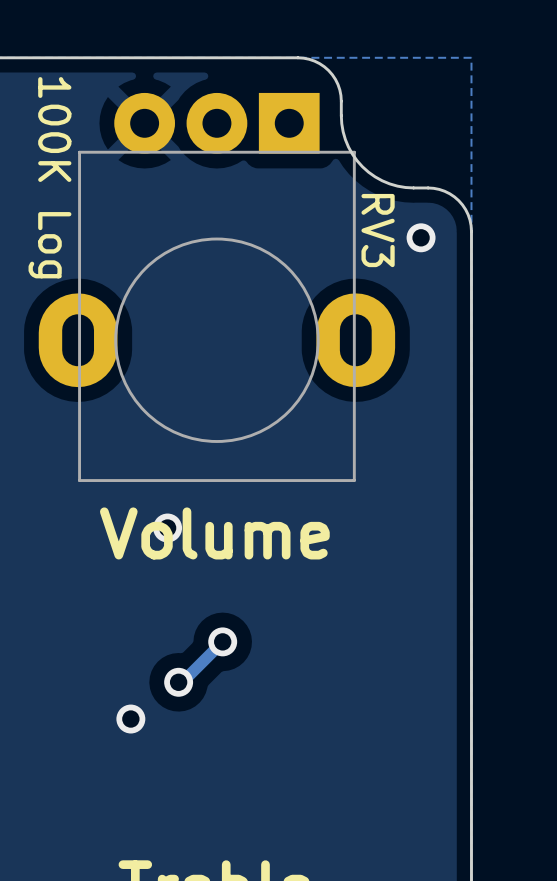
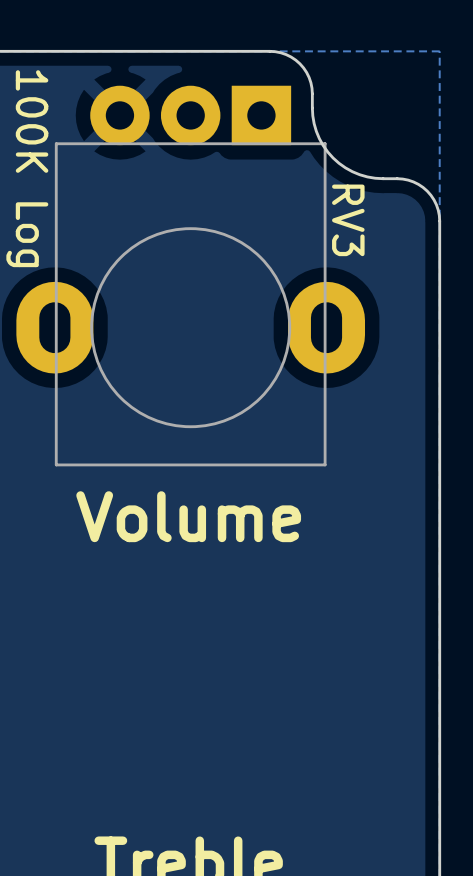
via: (421, 237) -> none
via: (167, 528) -> none
track: (222, 641) (182, 682) (178, 682) -> none
via: (222, 641) -> none
via: (178, 682) -> none
via: (130, 719) -> none

